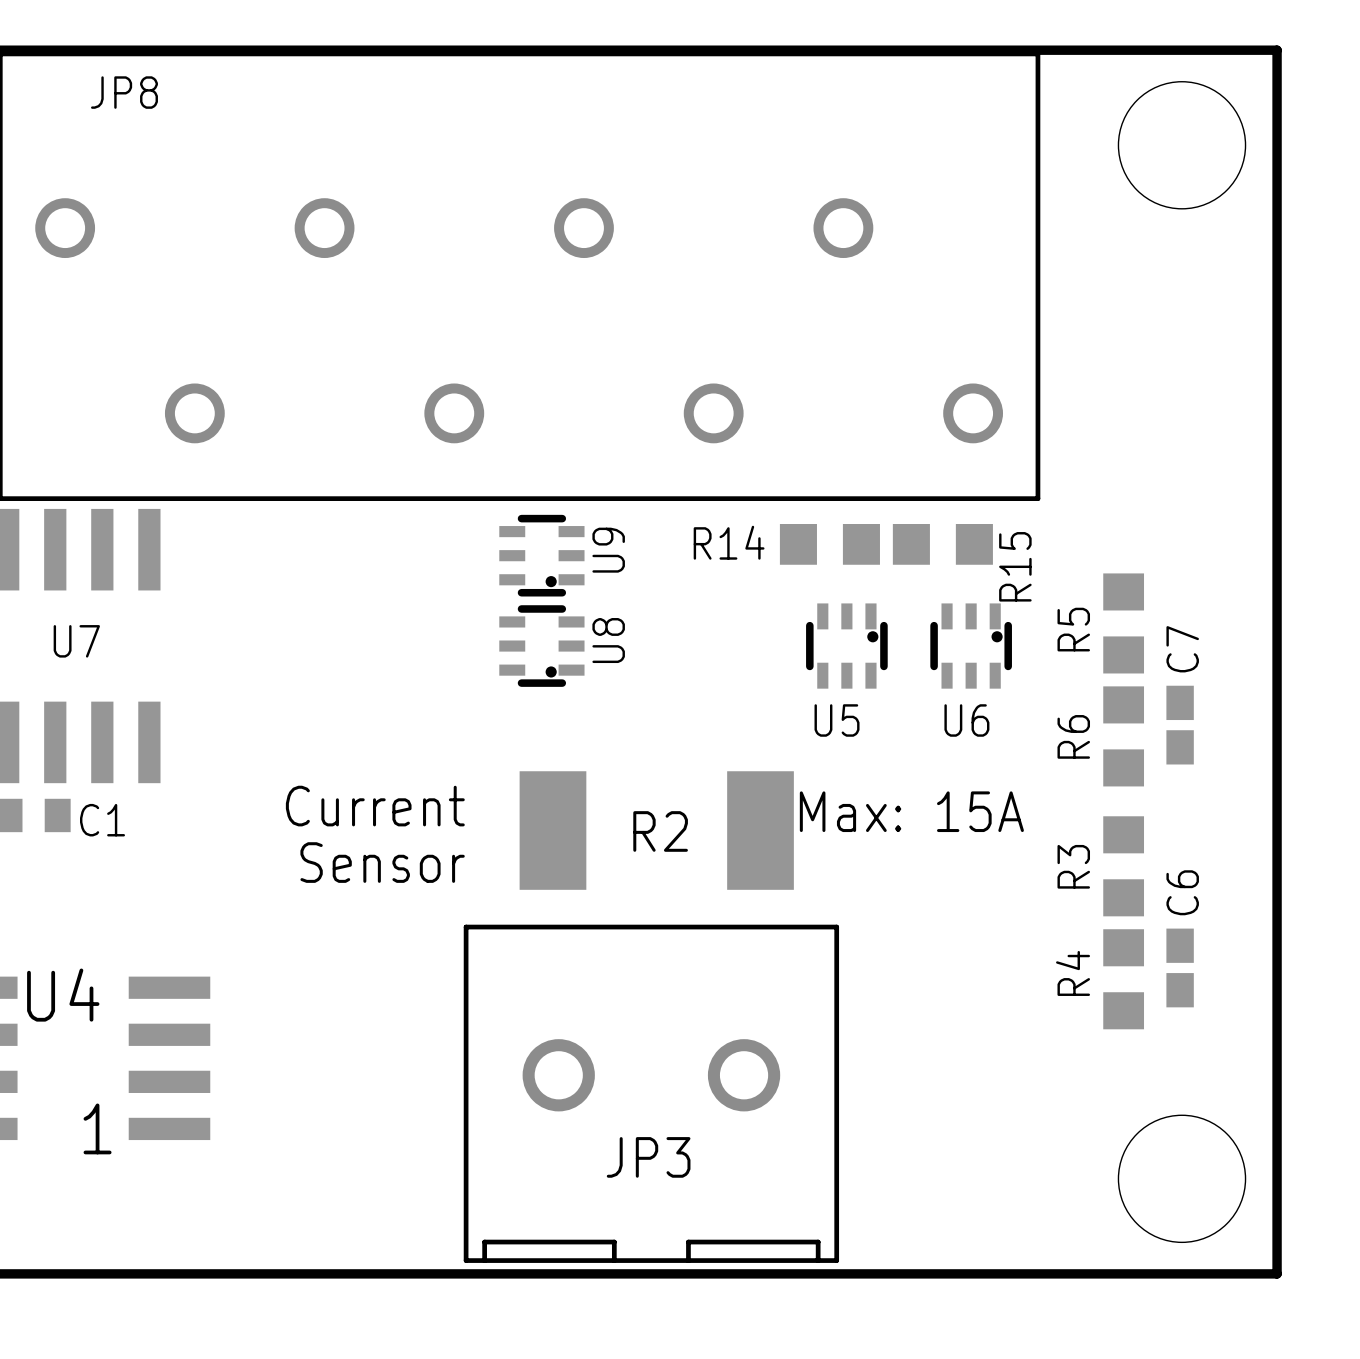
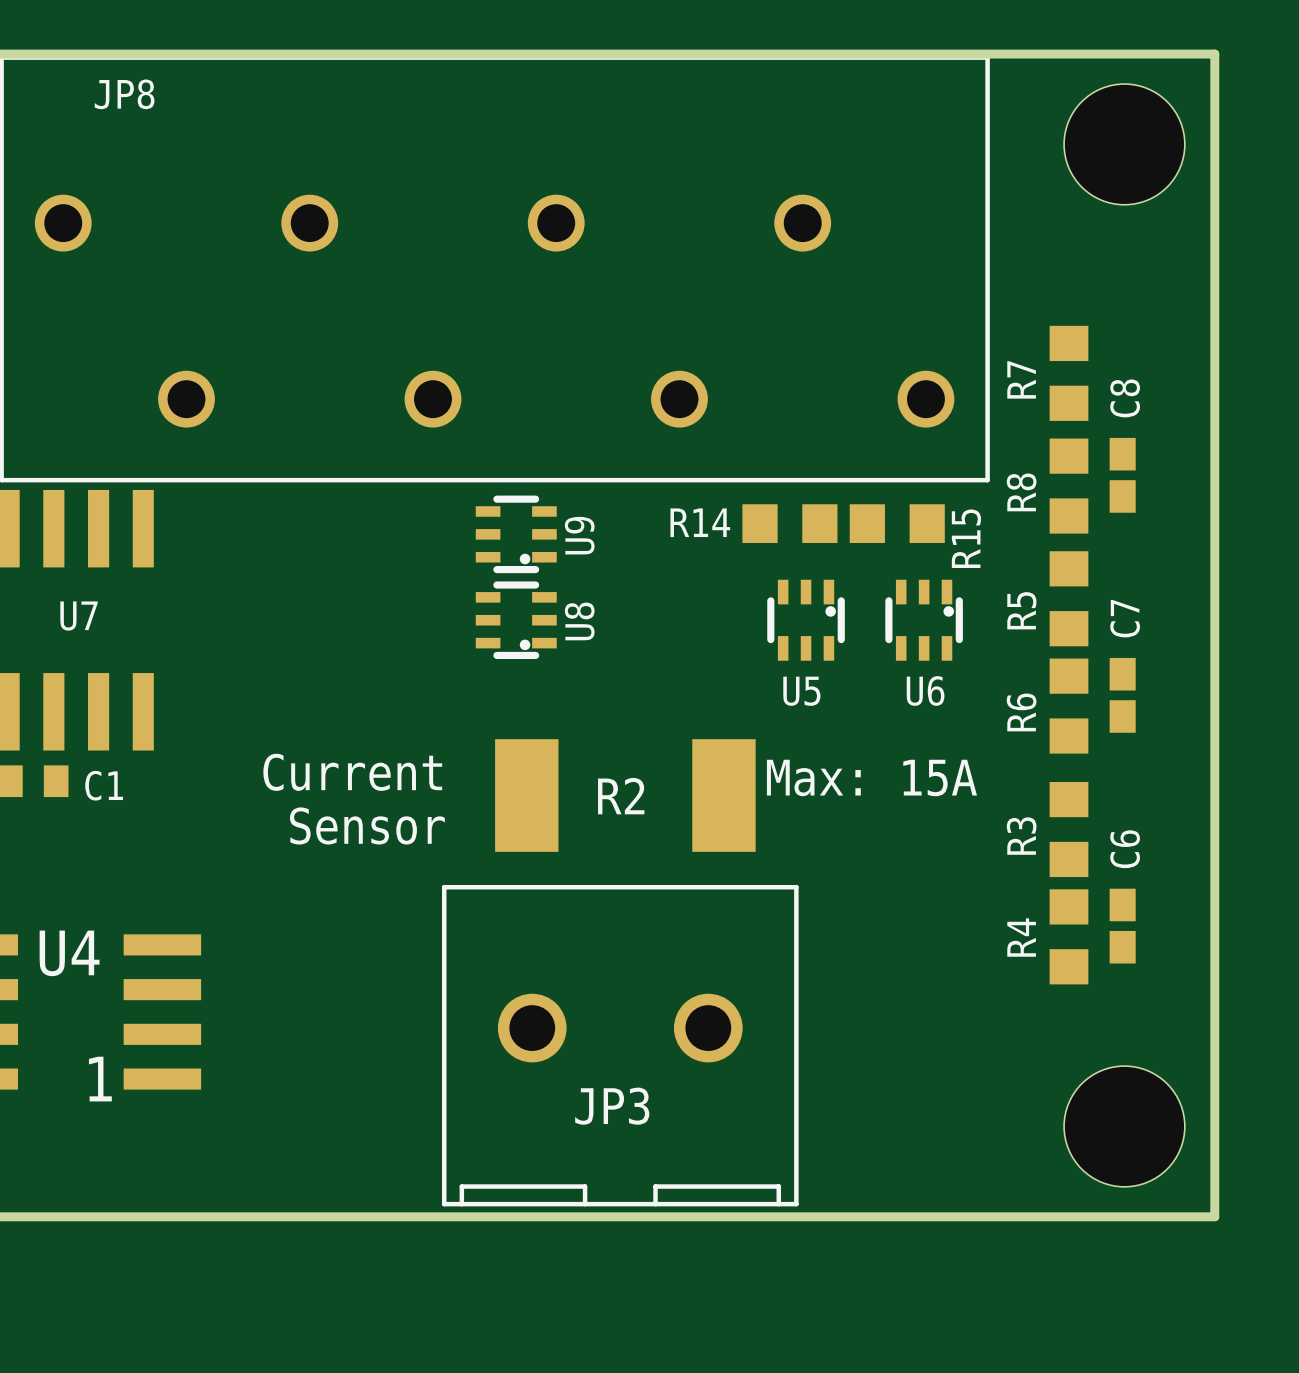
R7: none -> (1069, 373)
C8: none -> (1122, 475)
R8: none -> (1069, 486)

